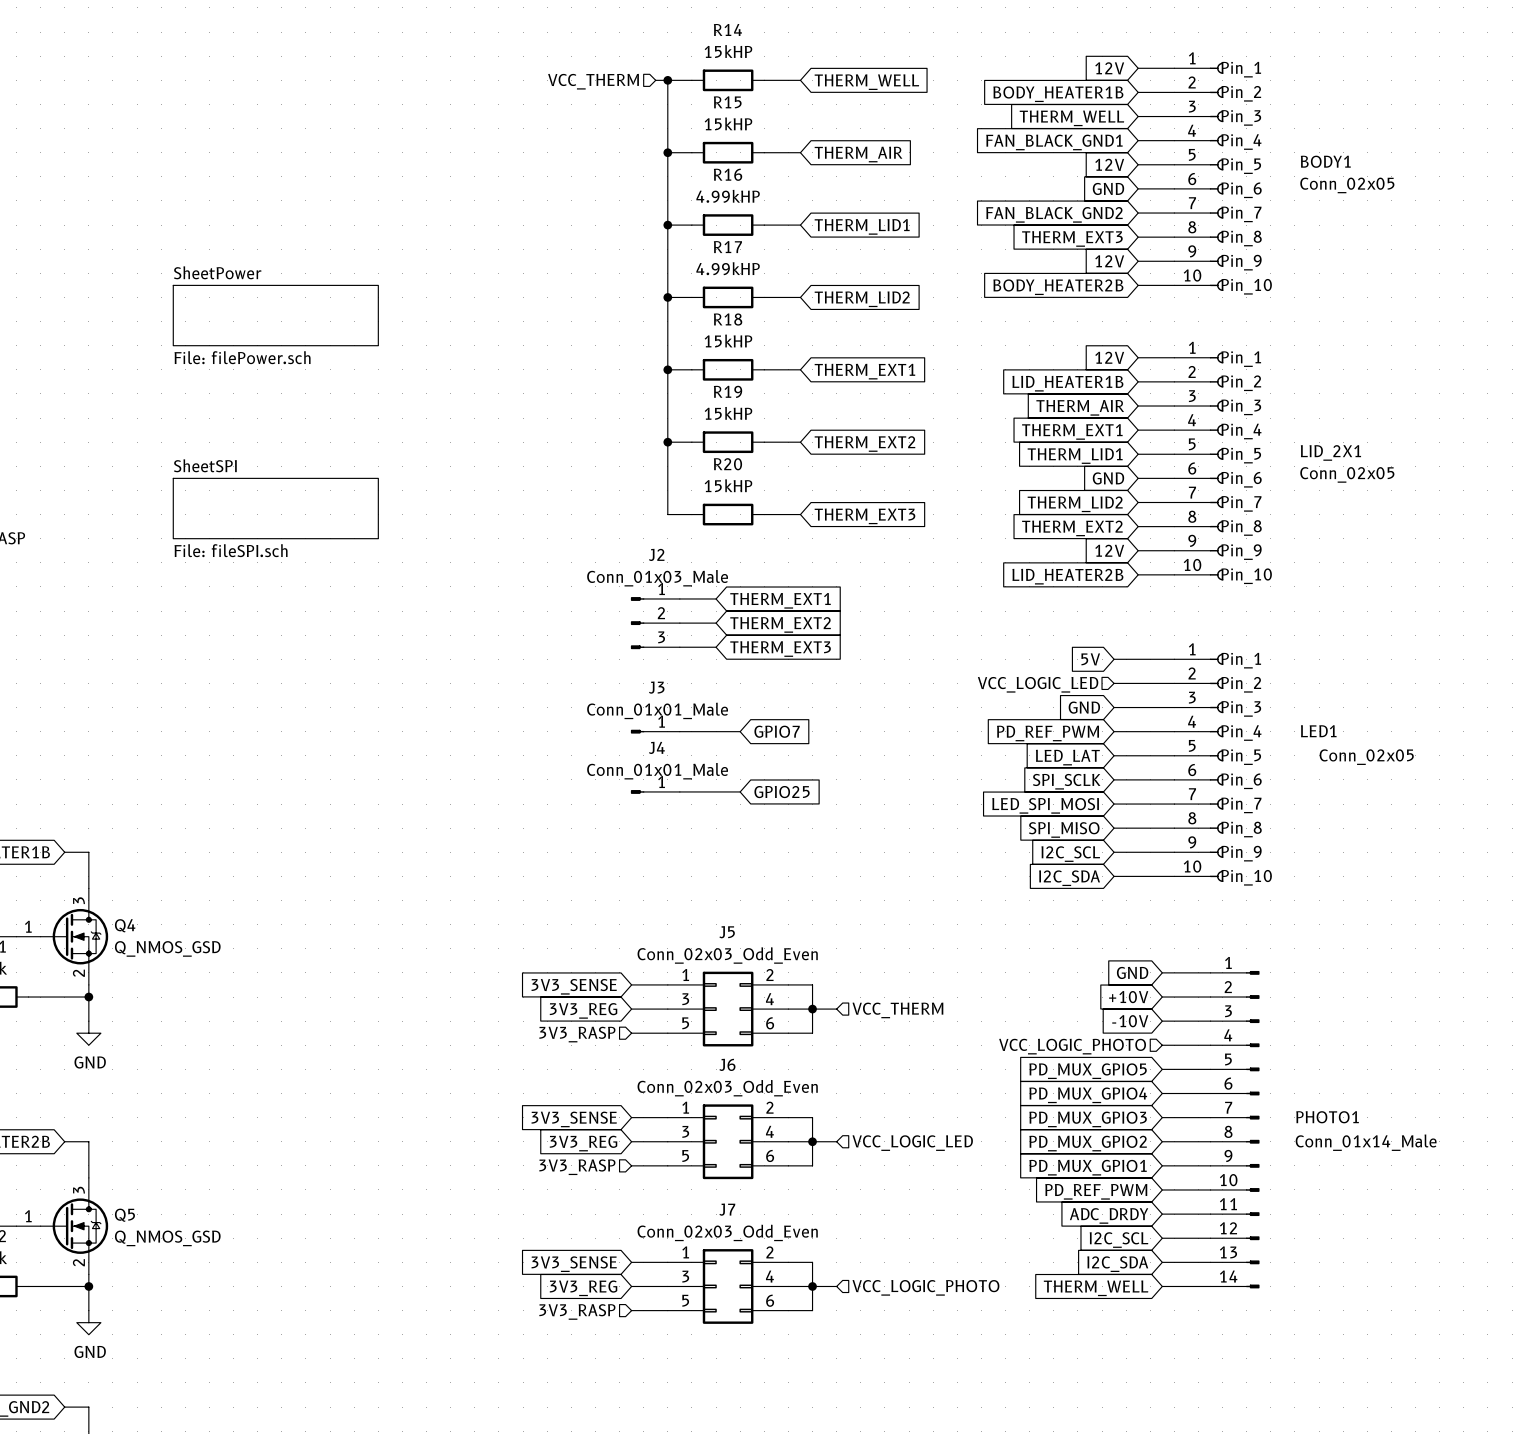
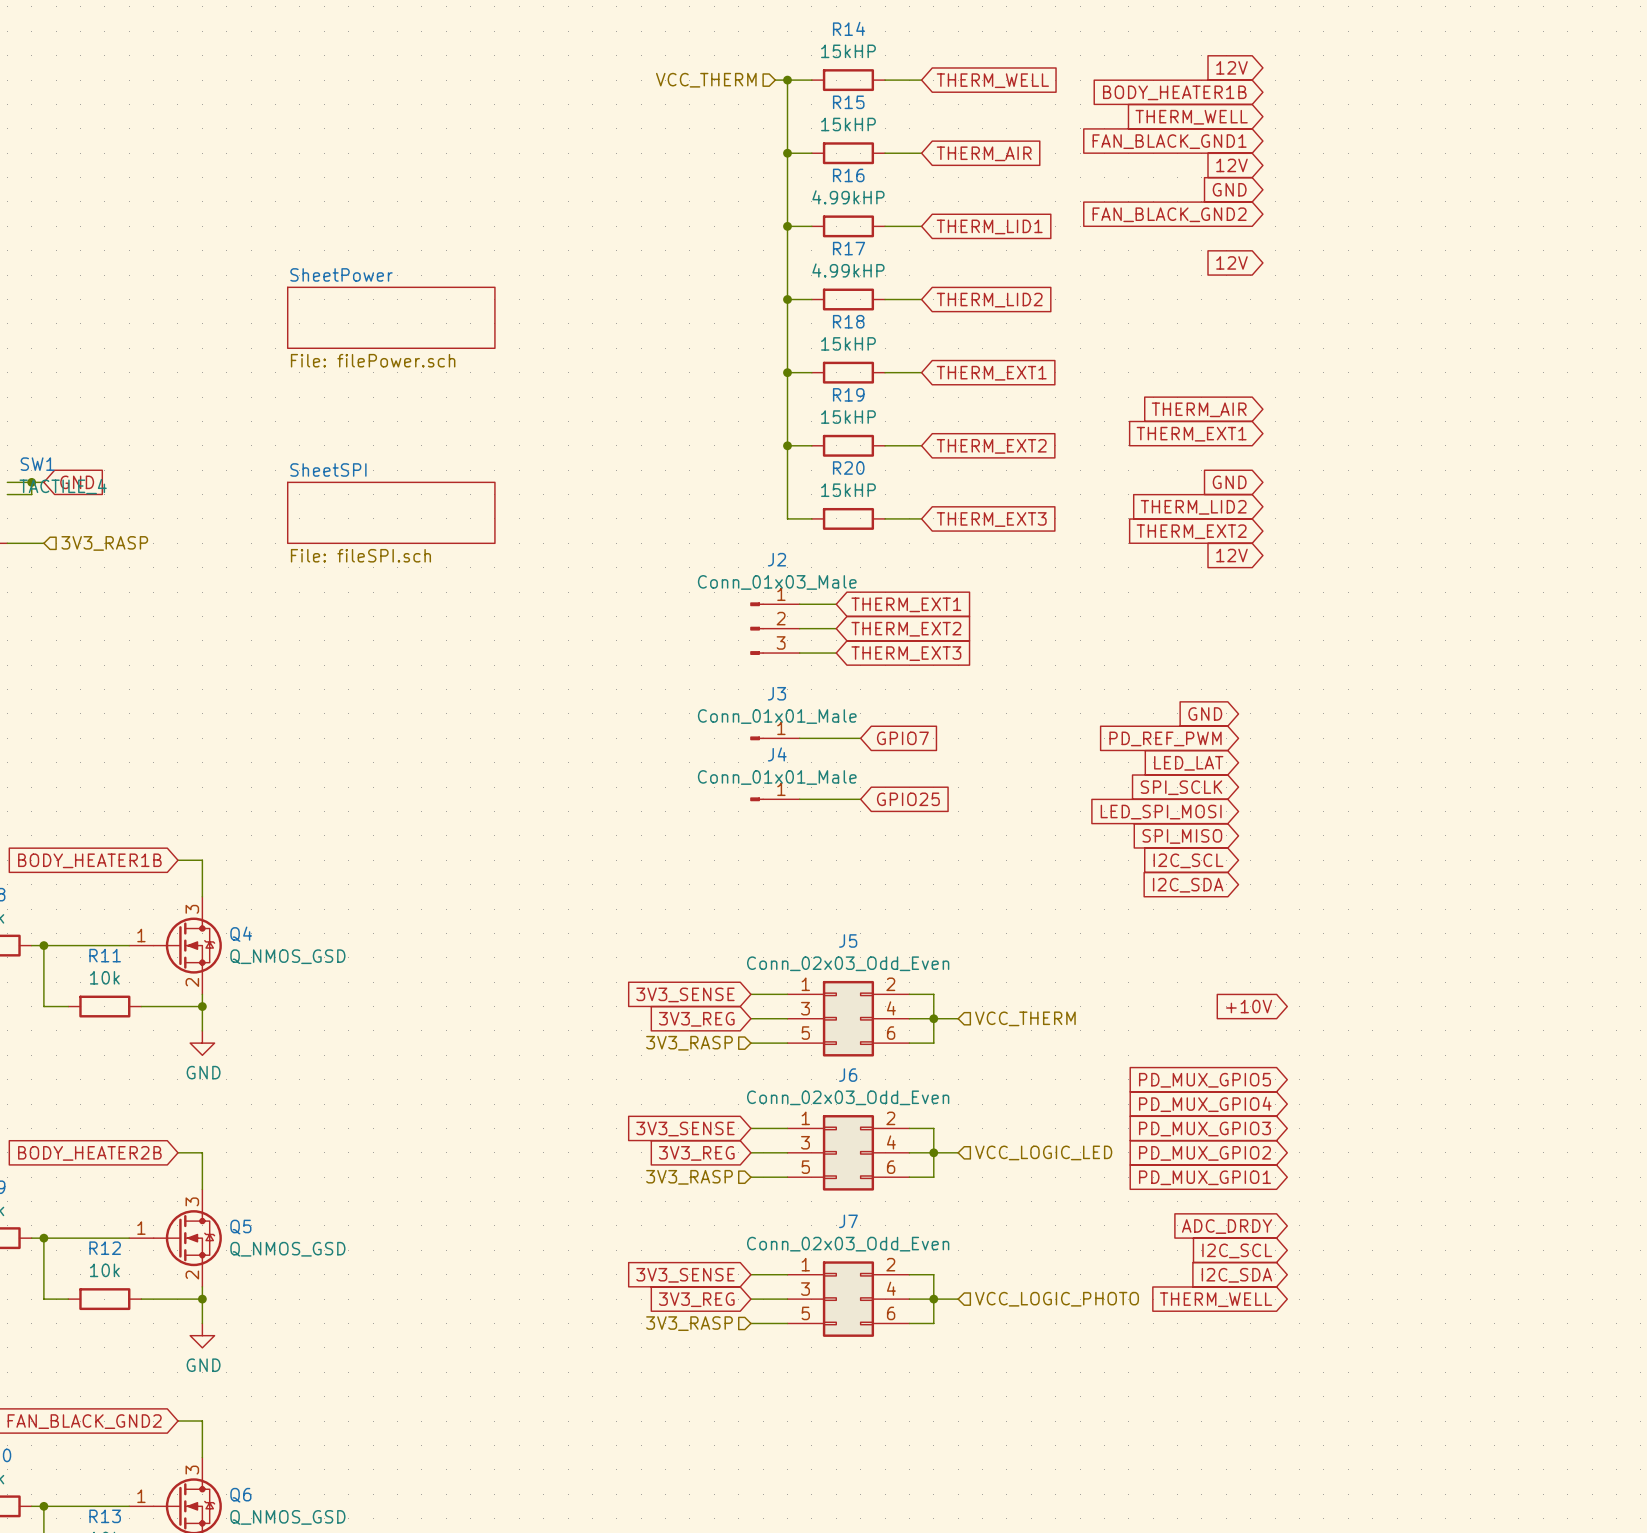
wire: (1138, 68) (1174, 68) -> none
wire: (1138, 92) (1174, 92) -> none
wire: (1138, 116) (1174, 116) -> none
wire: (1138, 140) (1174, 140) -> none
wire: (1138, 164) (1174, 164) -> none
BODY1: Conn_02x05 (1198, 176) -> none
wire: (1138, 188) (1174, 188) -> none
wire: (1138, 213) (1174, 213) -> none
wire: (1138, 237) (1174, 237) -> none
global label: THERM_EXT3 (1072, 238) -> none
wire: (1138, 261) (1174, 261) -> none
wire: (1138, 285) (1174, 285) -> none
global label: BODY_HEATER2B (1058, 287) -> none
global label: 12V (1109, 357) -> none
wire: (1138, 357) (1174, 357) -> none
wire: (1138, 381) (1174, 381) -> none
global label: LID_HEATER1B (1067, 383) -> none
wire: (1138, 406) (1174, 406) -> none
wire: (1138, 430) (1174, 430) -> none
wire: (1138, 454) (1174, 454) -> none
global label: THERM_LID1 (1075, 456) -> none
LID_2X1: Conn_02x05 (1198, 466) -> none
wire: (1138, 478) (1174, 478) -> none
wire: (1138, 502) (1174, 502) -> none
wire: (1138, 526) (1174, 526) -> none
wire: (1138, 550) (1174, 550) -> none
wire: (1138, 574) (1174, 574) -> none
global label: LID_HEATER2B (1067, 576) -> none
global label: 5V (1090, 659) -> none
wire: (1114, 659) (1174, 659) -> none
wire: (1114, 683) (1174, 683) -> none
hierarchical label: VCC_LOGIC_LED (1038, 684) -> none
wire: (1114, 707) (1174, 707) -> none
wire: (1114, 731) (1174, 731) -> none
wire: (1114, 755) (1174, 755) -> none
LED1: Conn_02x05 (1198, 767) -> none
wire: (1114, 779) (1174, 779) -> none
wire: (1114, 804) (1174, 804) -> none
wire: (1114, 828) (1174, 828) -> none
wire: (1114, 852) (1174, 852) -> none
wire: (1114, 876) (1174, 876) -> none
global label: GND (1132, 972) -> none
wire: (1162, 972) (1210, 972) -> none
wire: (1162, 997) (1210, 997) -> none
global label: -10V (1130, 1021) -> none
wire: (1162, 1021) (1210, 1021) -> none
wire: (1162, 1045) (1210, 1045) -> none
hierarchical label: VCC_LOGIC_PHOTO (1072, 1046) -> none
wire: (1162, 1069) (1210, 1069) -> none
wire: (1162, 1093) (1210, 1093) -> none
wire: (1162, 1117) (1210, 1117) -> none
PHOTO1: Conn_01x14_Male (1235, 1129) -> none
wire: (1162, 1141) (1210, 1141) -> none
wire: (1162, 1165) (1210, 1165) -> none
wire: (1162, 1189) (1210, 1189) -> none
global label: PD_REF_PWM (1096, 1191) -> none
wire: (1162, 1214) (1210, 1214) -> none
wire: (1162, 1238) (1210, 1238) -> none
wire: (1162, 1262) (1210, 1262) -> none
wire: (1162, 1286) (1210, 1286) -> none

